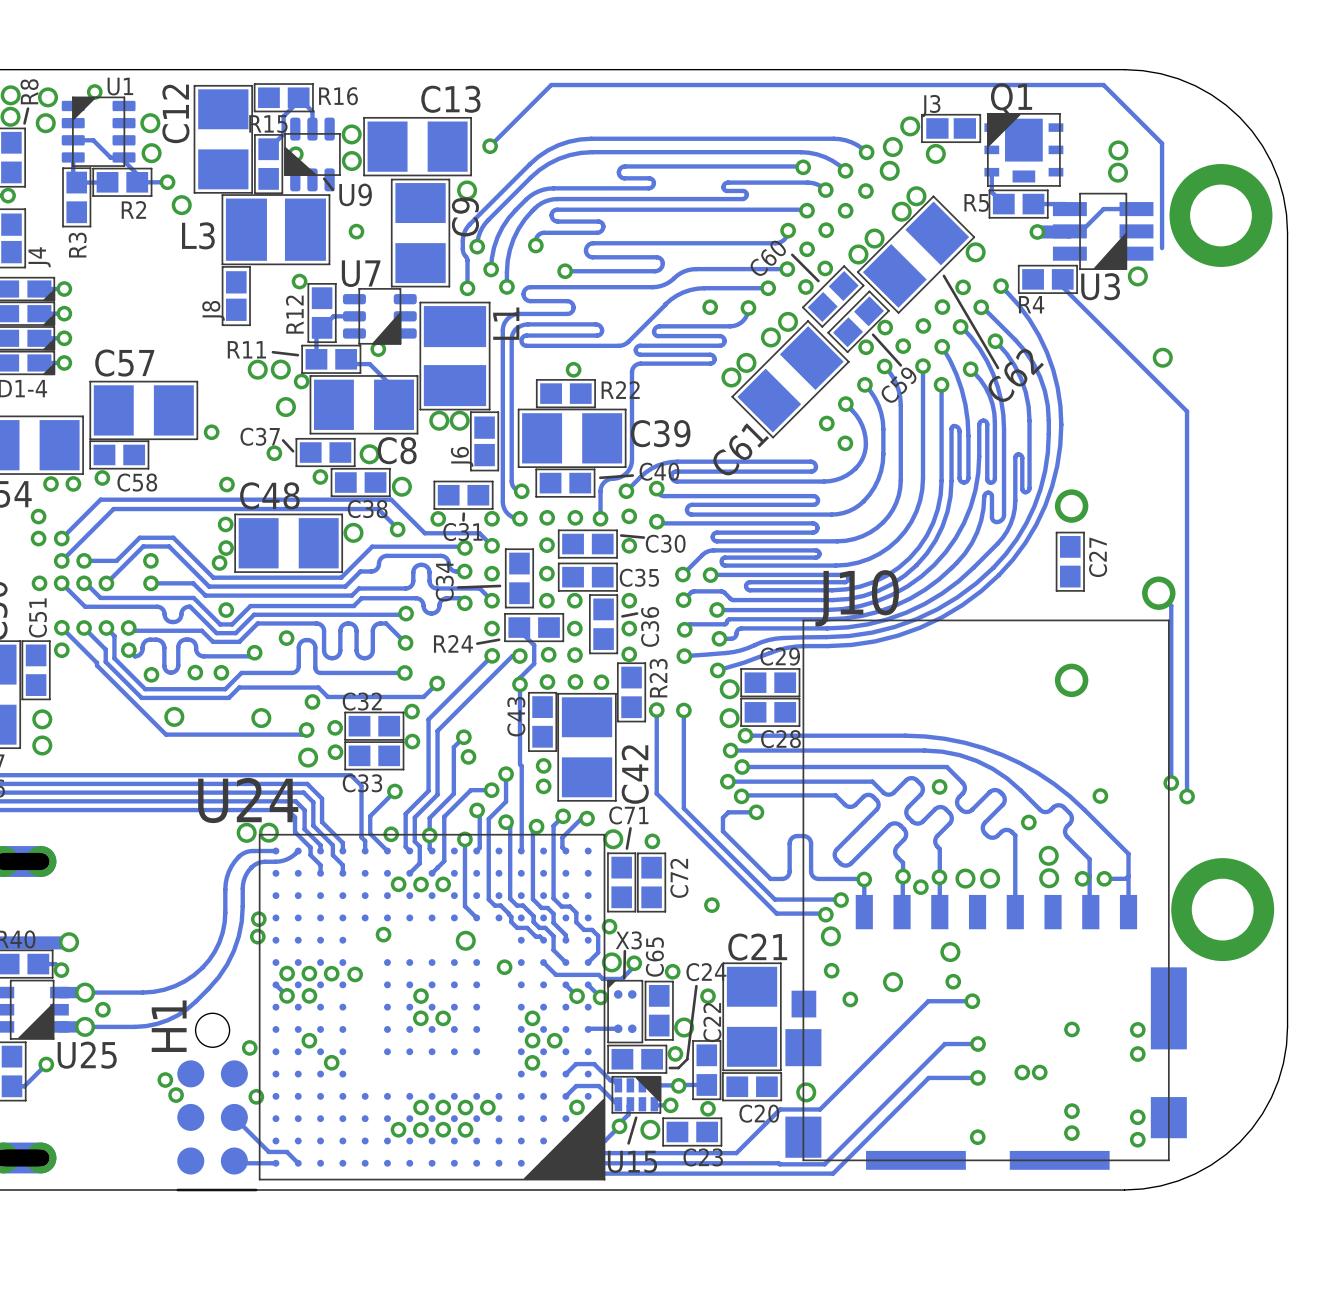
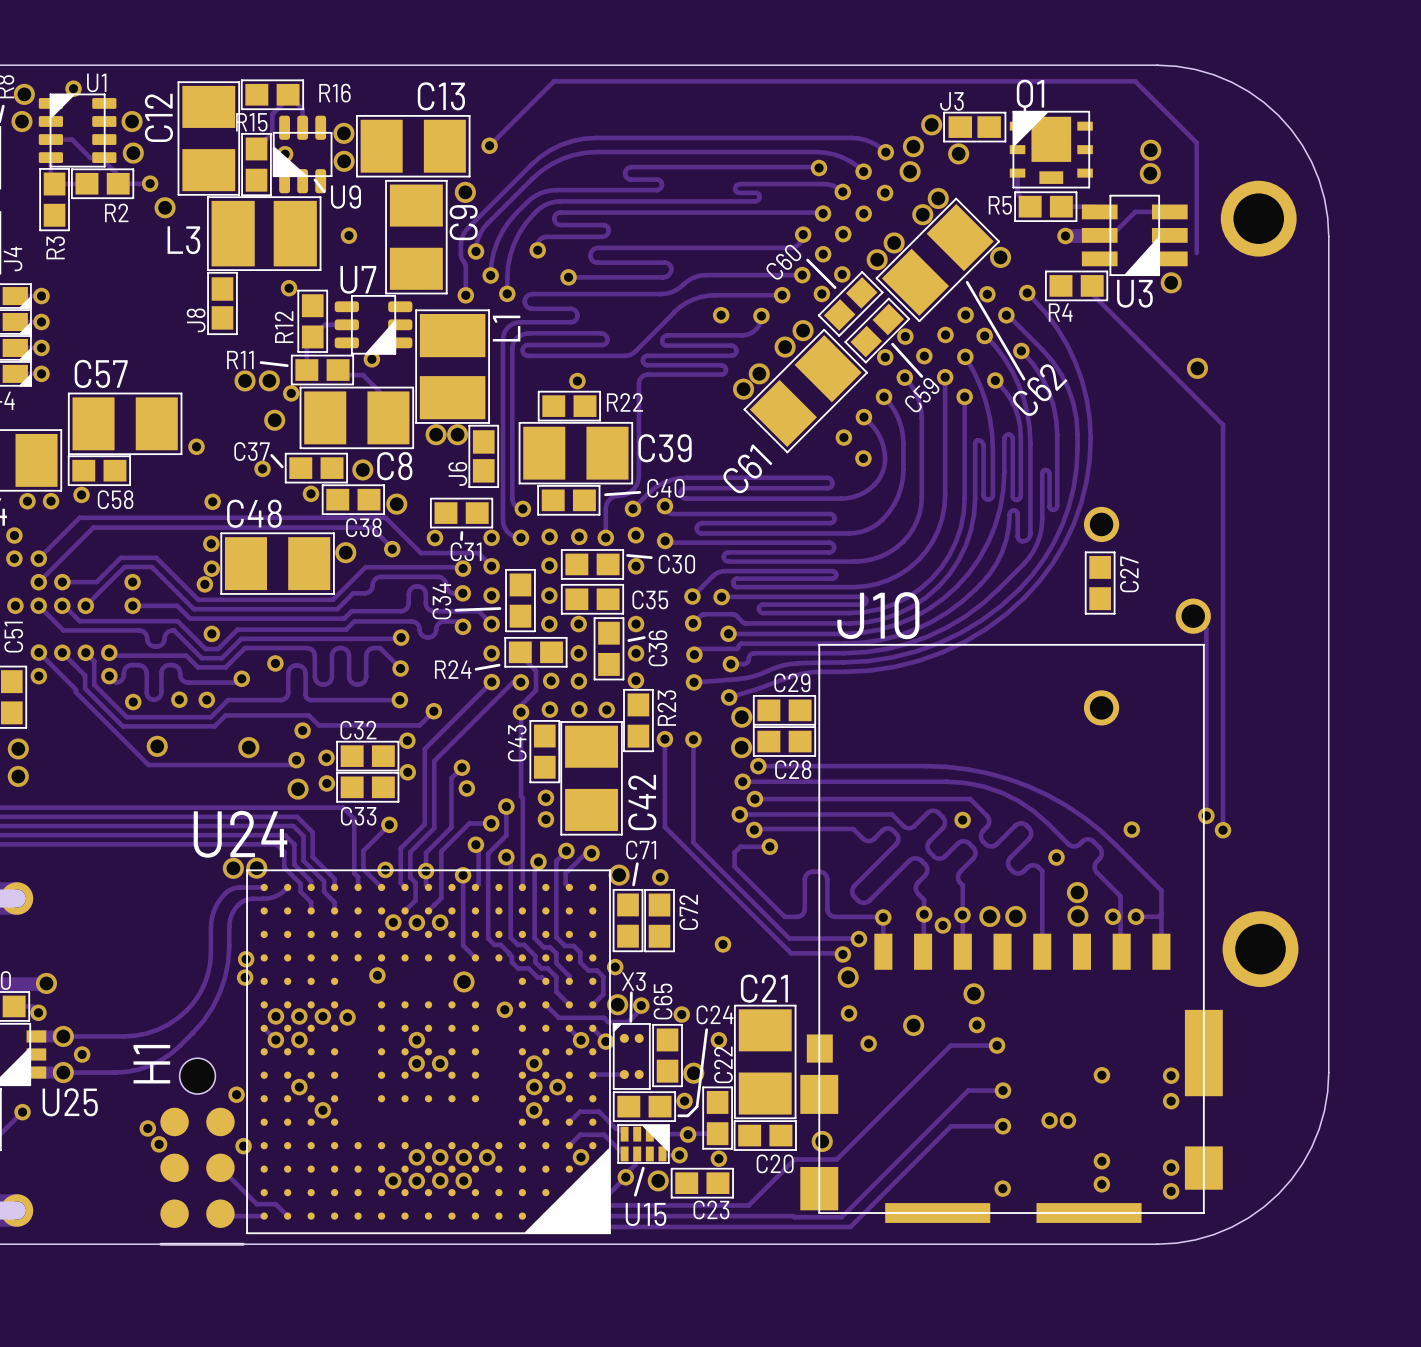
via: (1220, 215) -> none
part: none -> (1258, 218)
via: (1222, 909) -> none
part: none -> (1260, 949)

